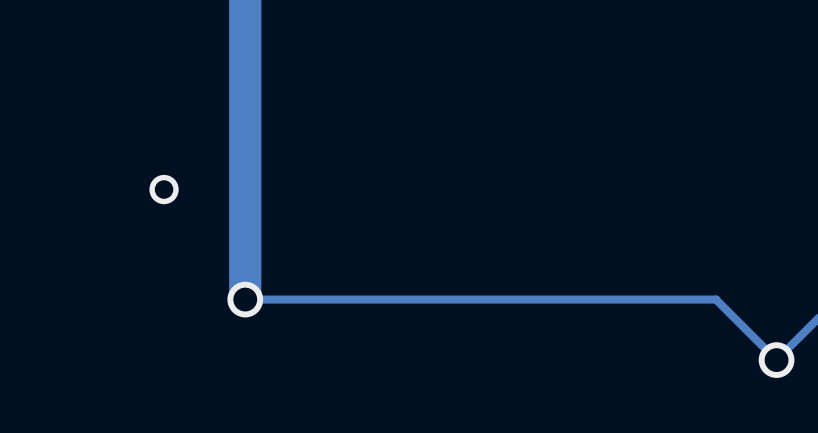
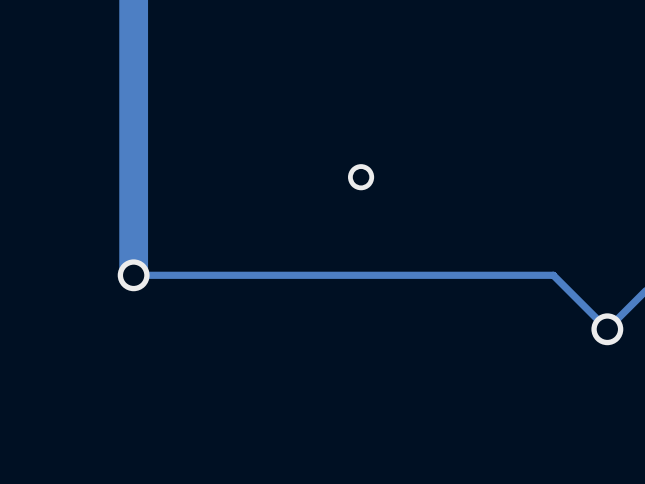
via: (164, 189) -> none
via: none -> (361, 177)

